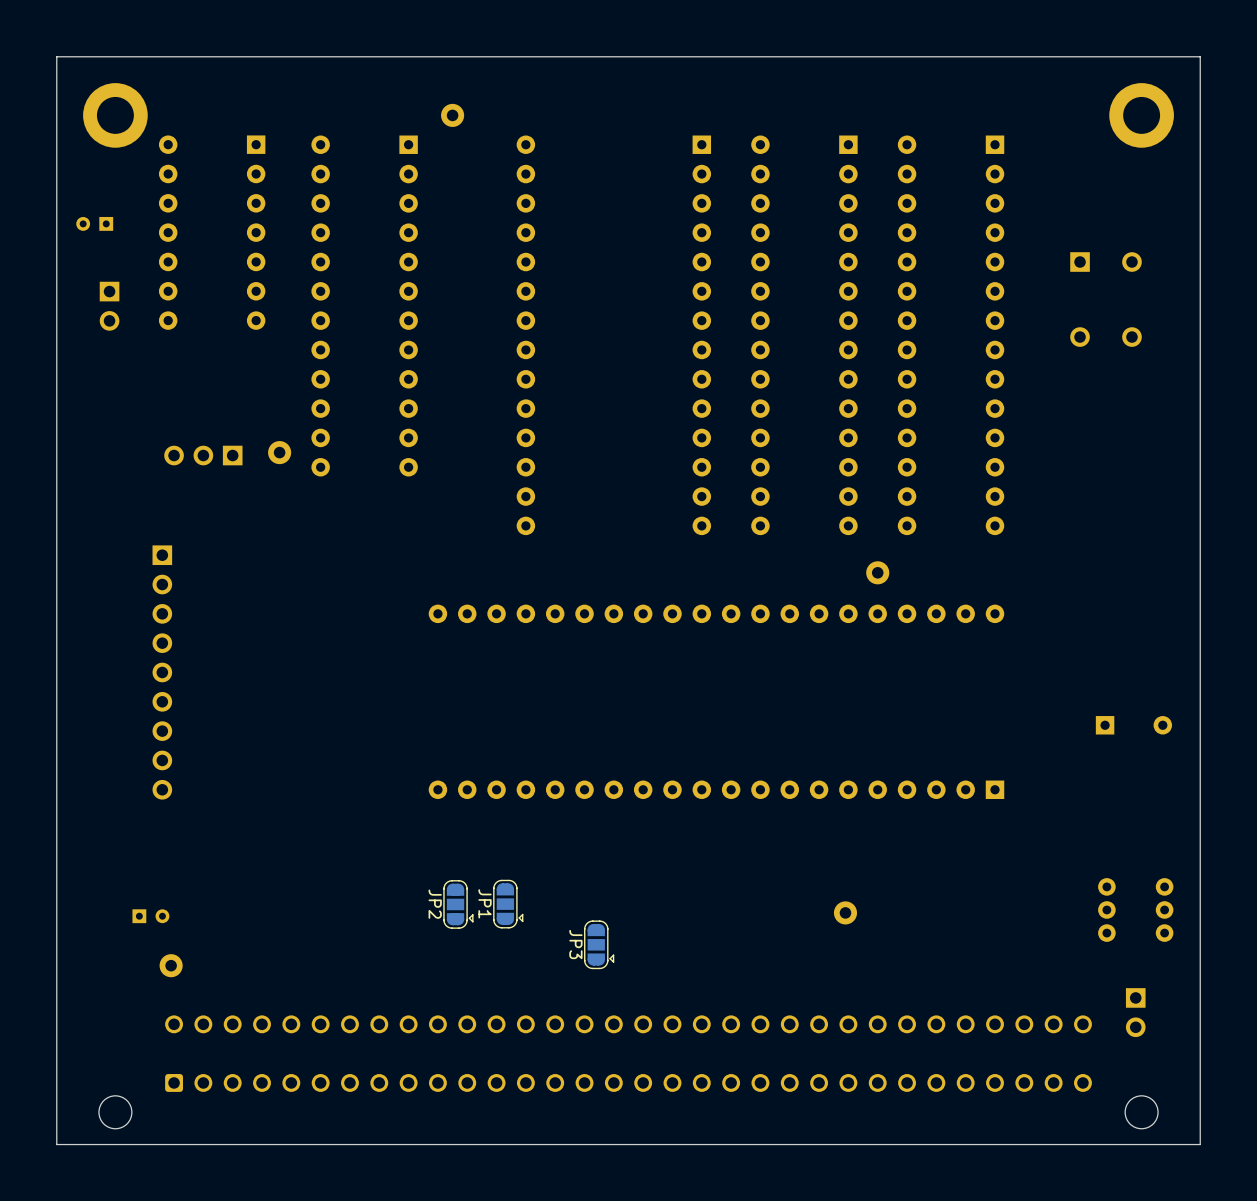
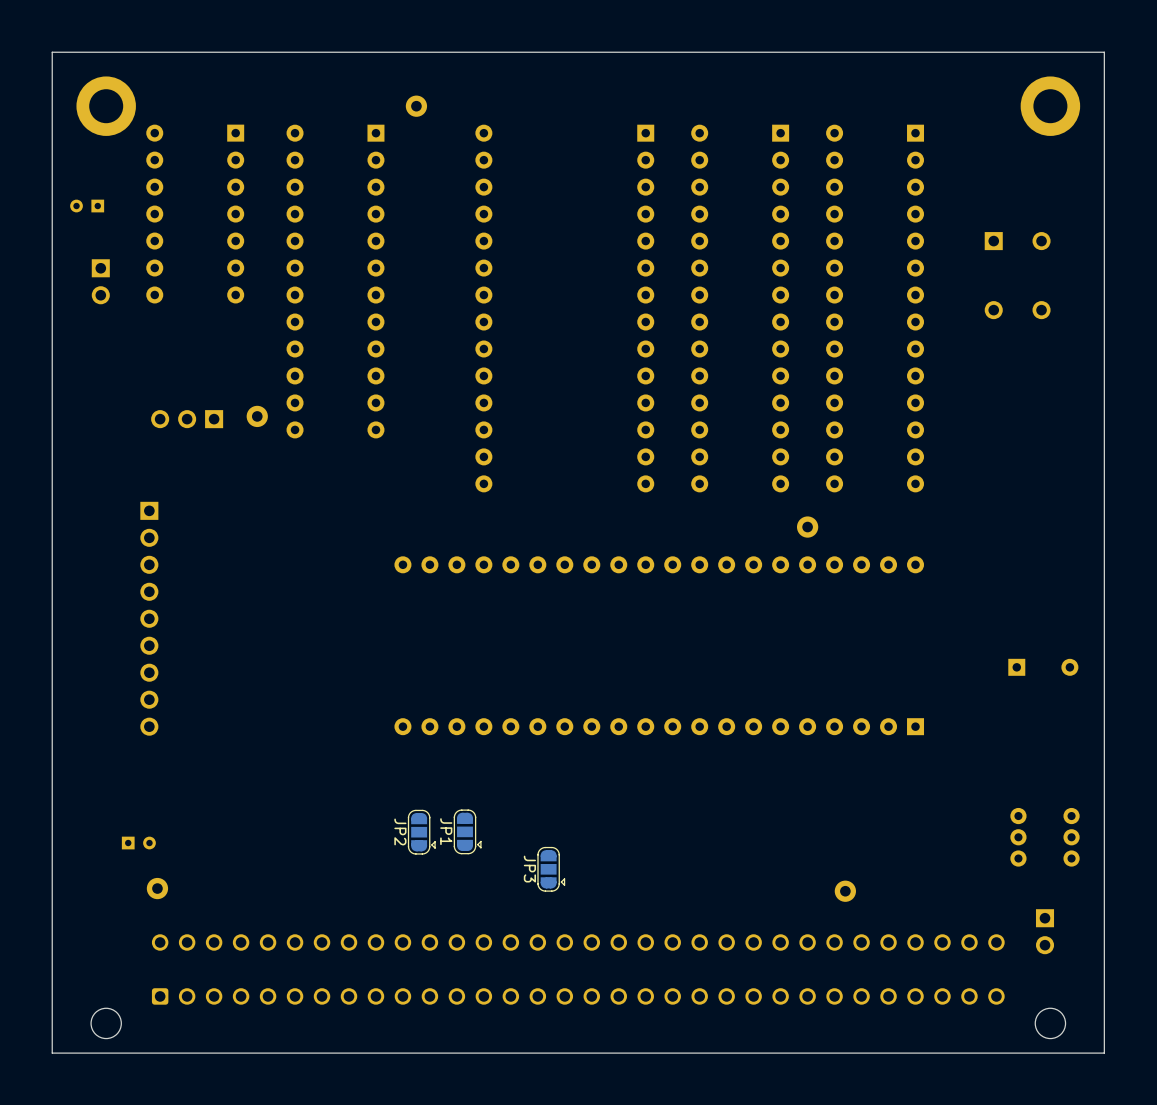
part position: (845, 912) -> (845, 891)

